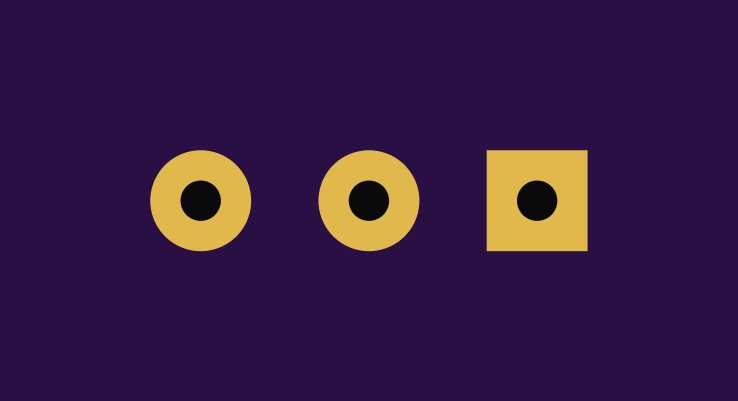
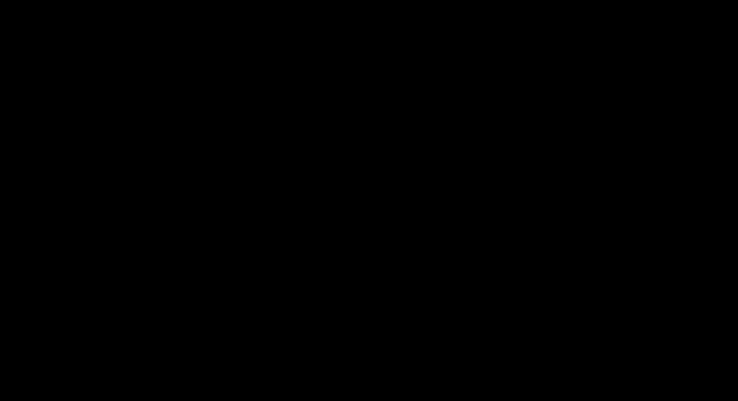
part: (368, 200) -> none

